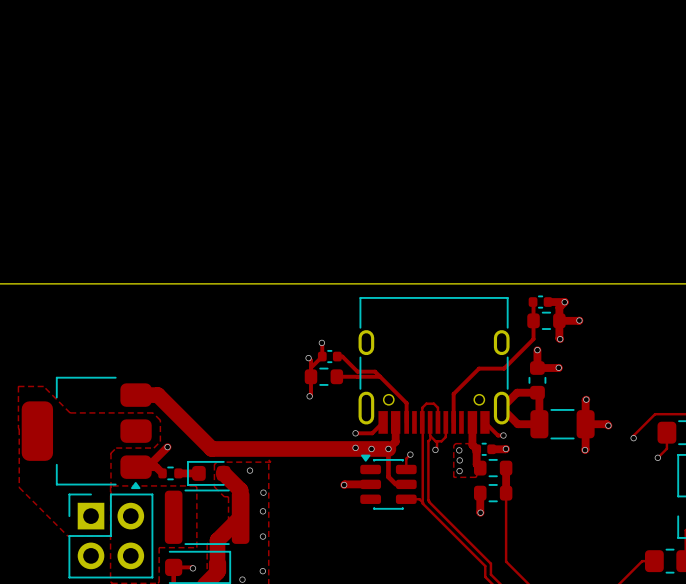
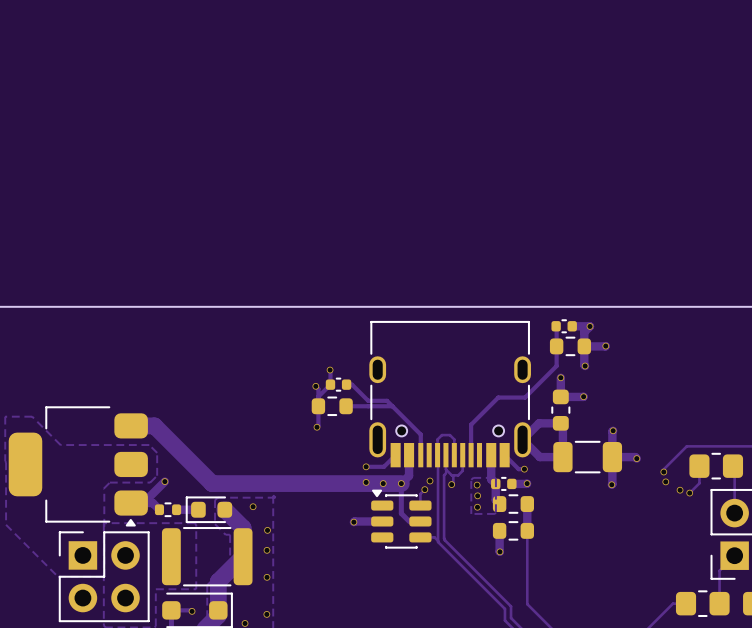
via: none -> (430, 480)
via: none -> (665, 481)
via: none -> (680, 490)

